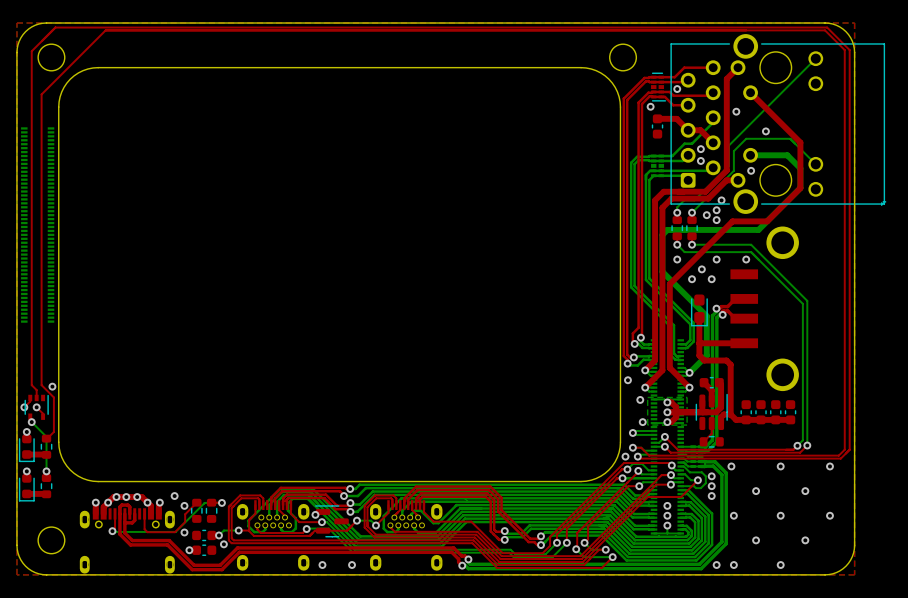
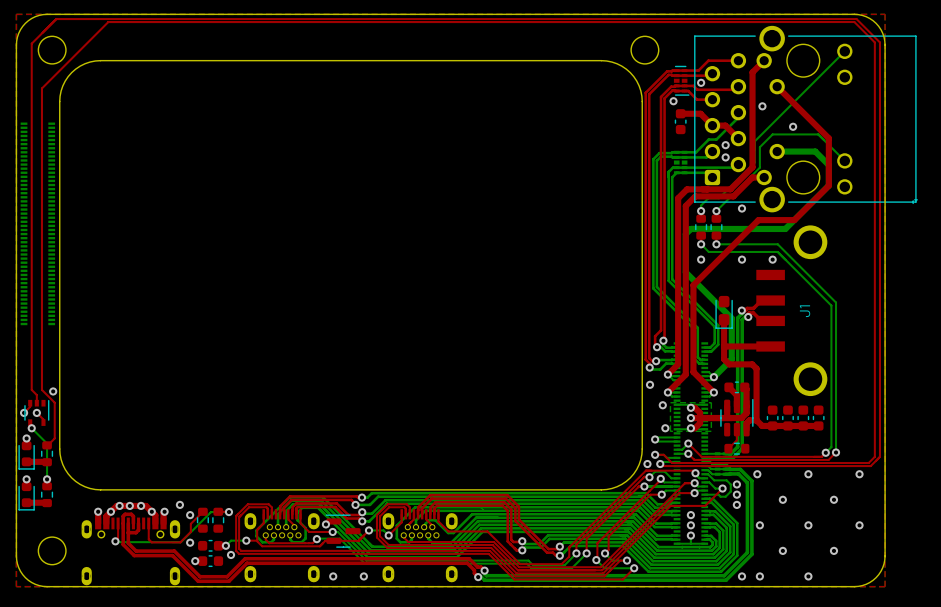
via: (751, 170) -> none
via: (721, 200) -> none
via: (706, 215) -> none
via: (716, 220) -> none
via: (701, 269) -> none
via: (692, 279) -> none
via: (711, 279) -> none
J1 name: none -> J1 (805, 311)

